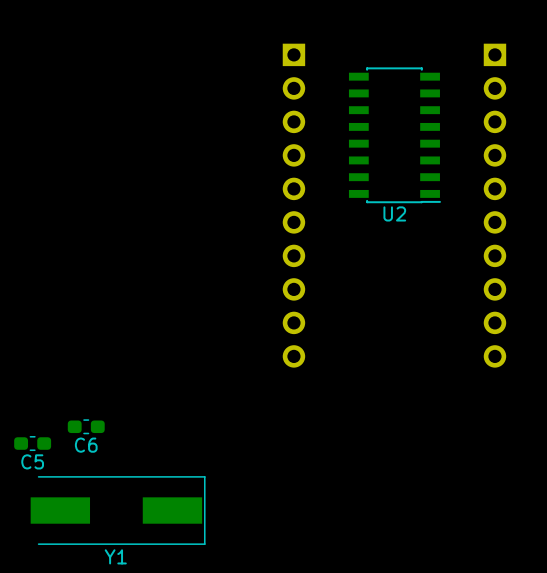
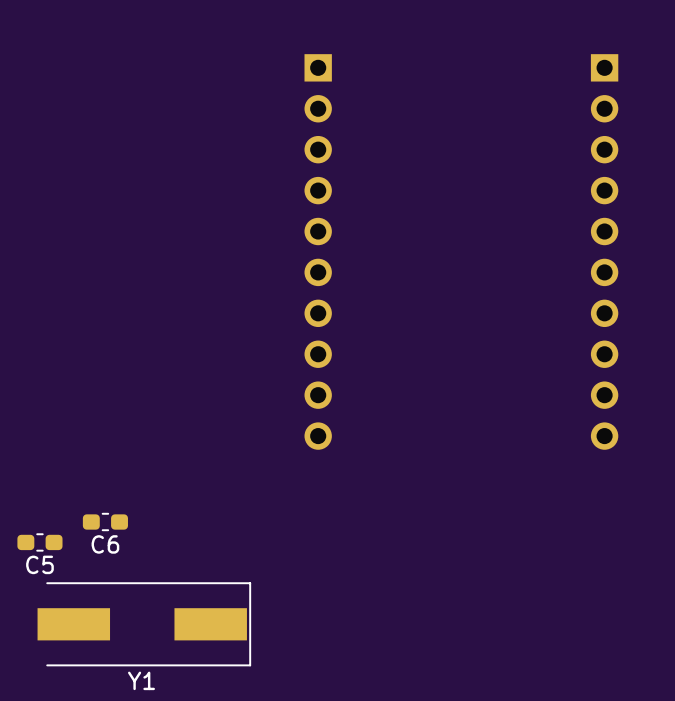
U2: (394, 135) -> none
part position: (293, 205) -> (318, 251)

